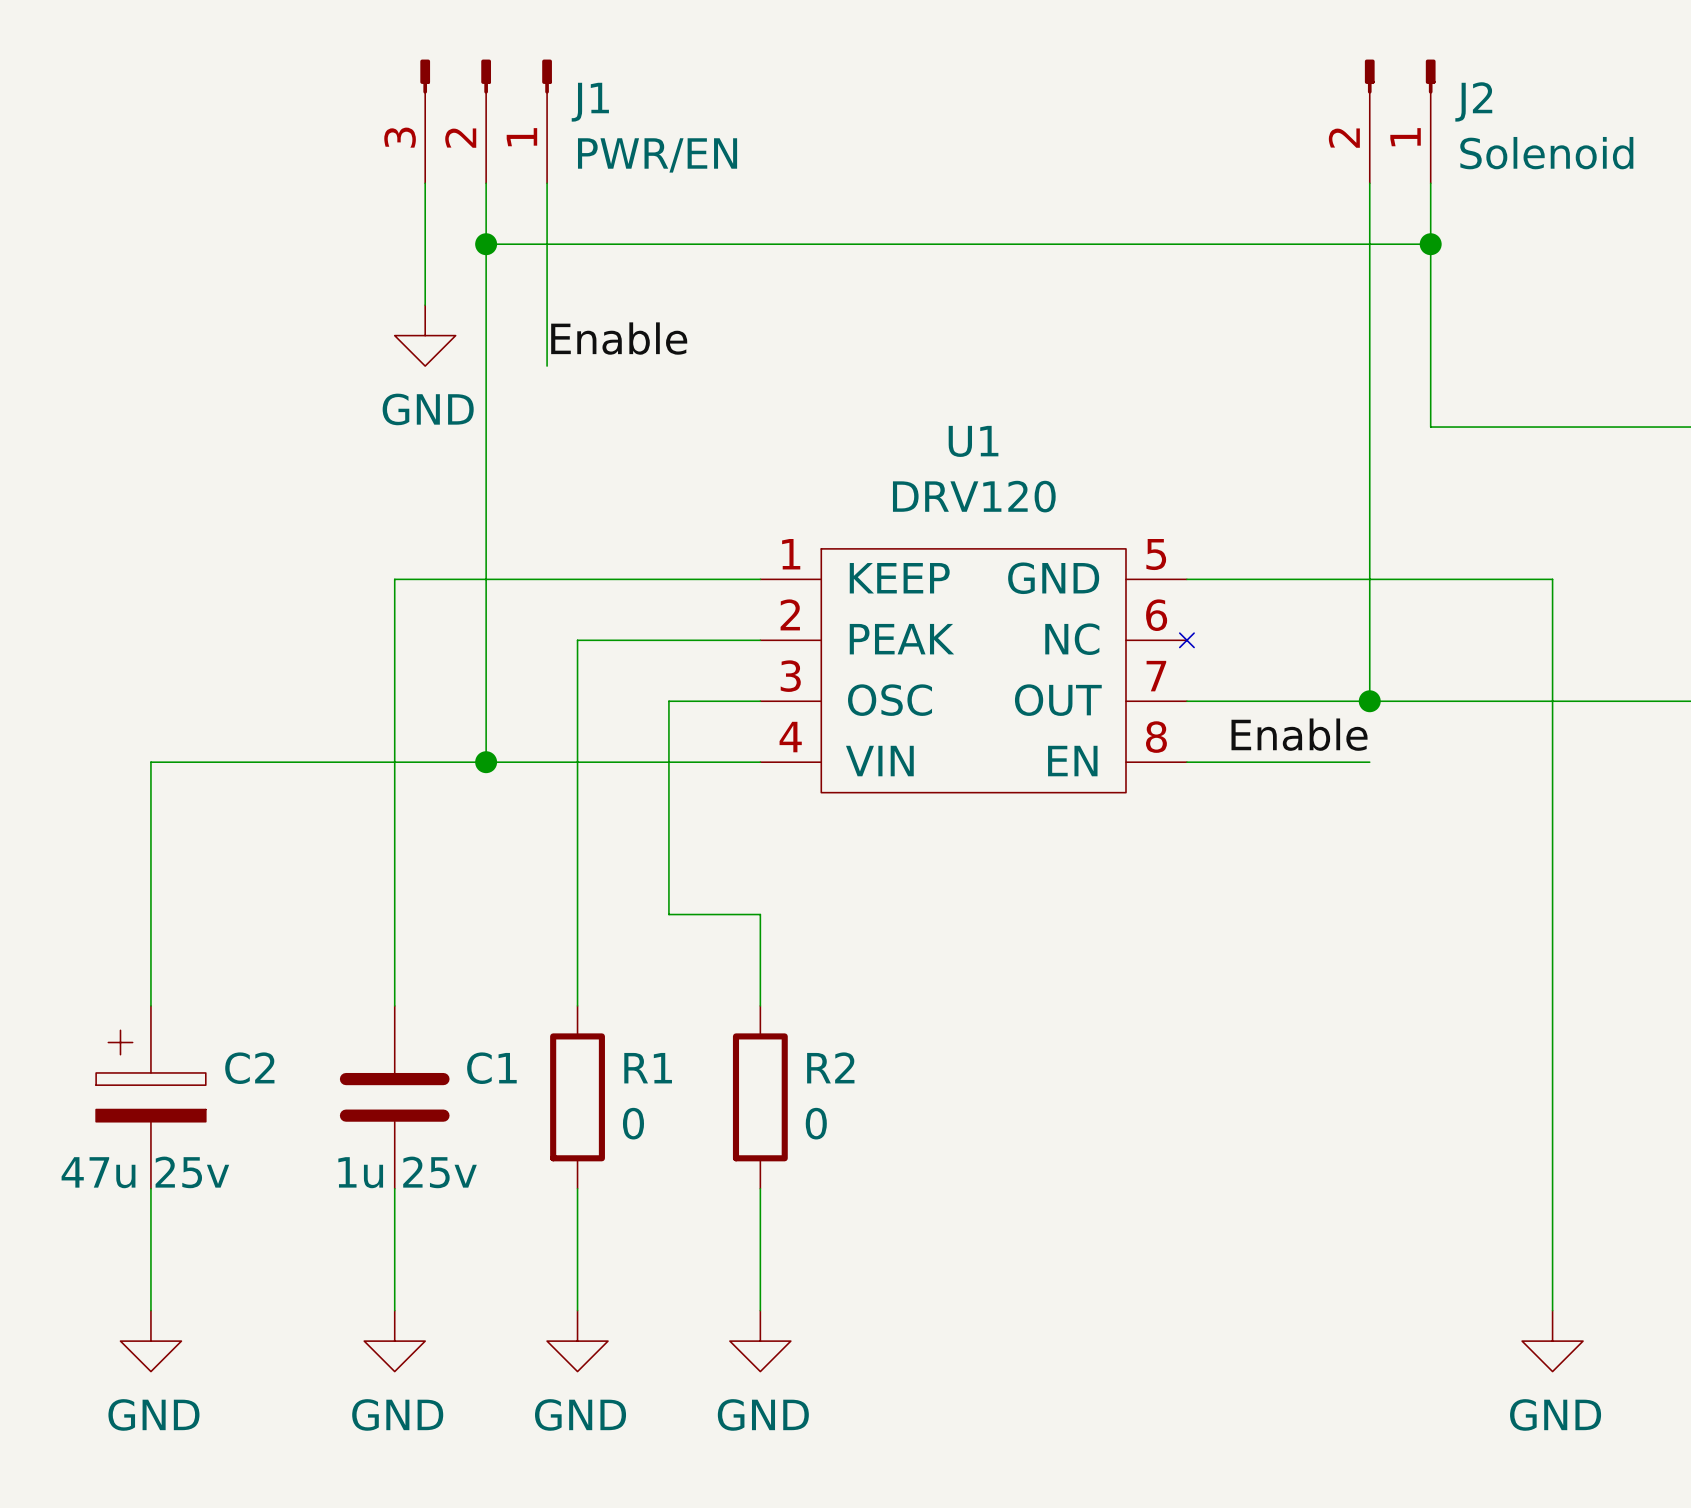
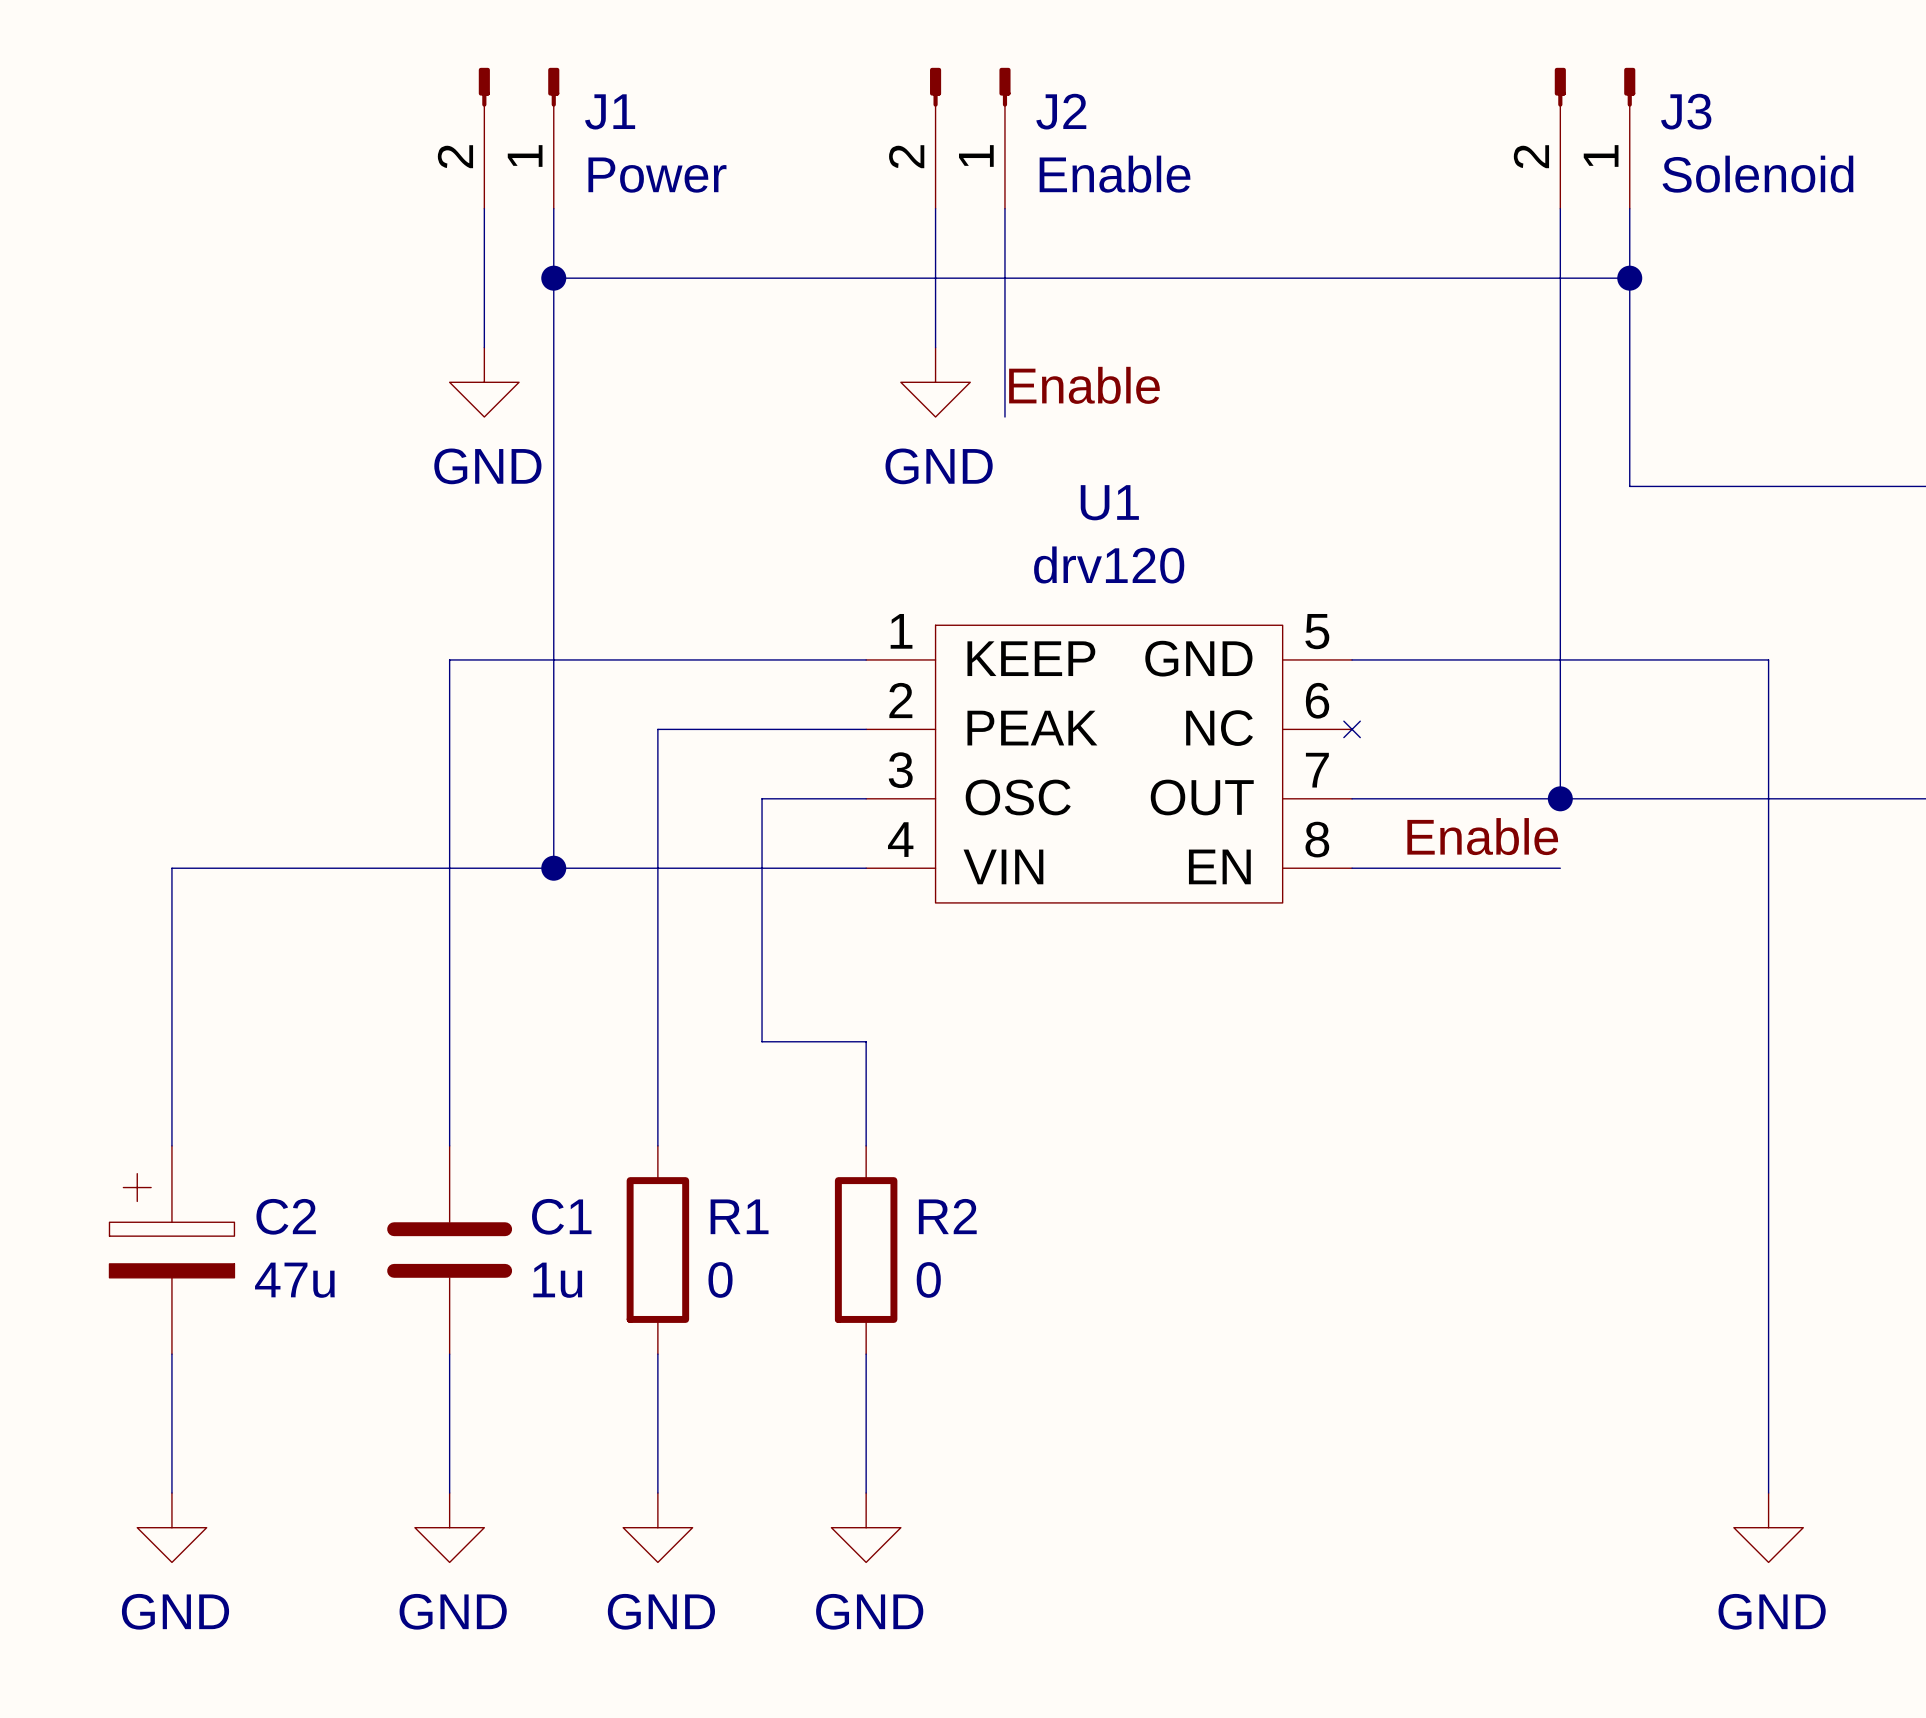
J1 symbol: [420, 59, 552, 184] -> [478, 67, 560, 209]
J2 name: J2 (1473, 101) -> J3 (1686, 111)
J2: none -> Enable (970, 138)
J1 value: PWR/EN (657, 155) -> Power (657, 175)
wire: (547, 183) (547, 366) -> (1004, 208) (1004, 417)
wire: none -> (935, 208) (935, 347)
power symbol: none -> GND (935, 382)
label position: Enable (619, 338) -> Enable (1084, 385)
U1 value: DRV120 (974, 496) -> drv120 (1109, 564)
C2 value: 47u 25v (145, 1172) -> 47u (294, 1280)
C1 value: 1u 25v (407, 1172) -> 1u (557, 1280)

